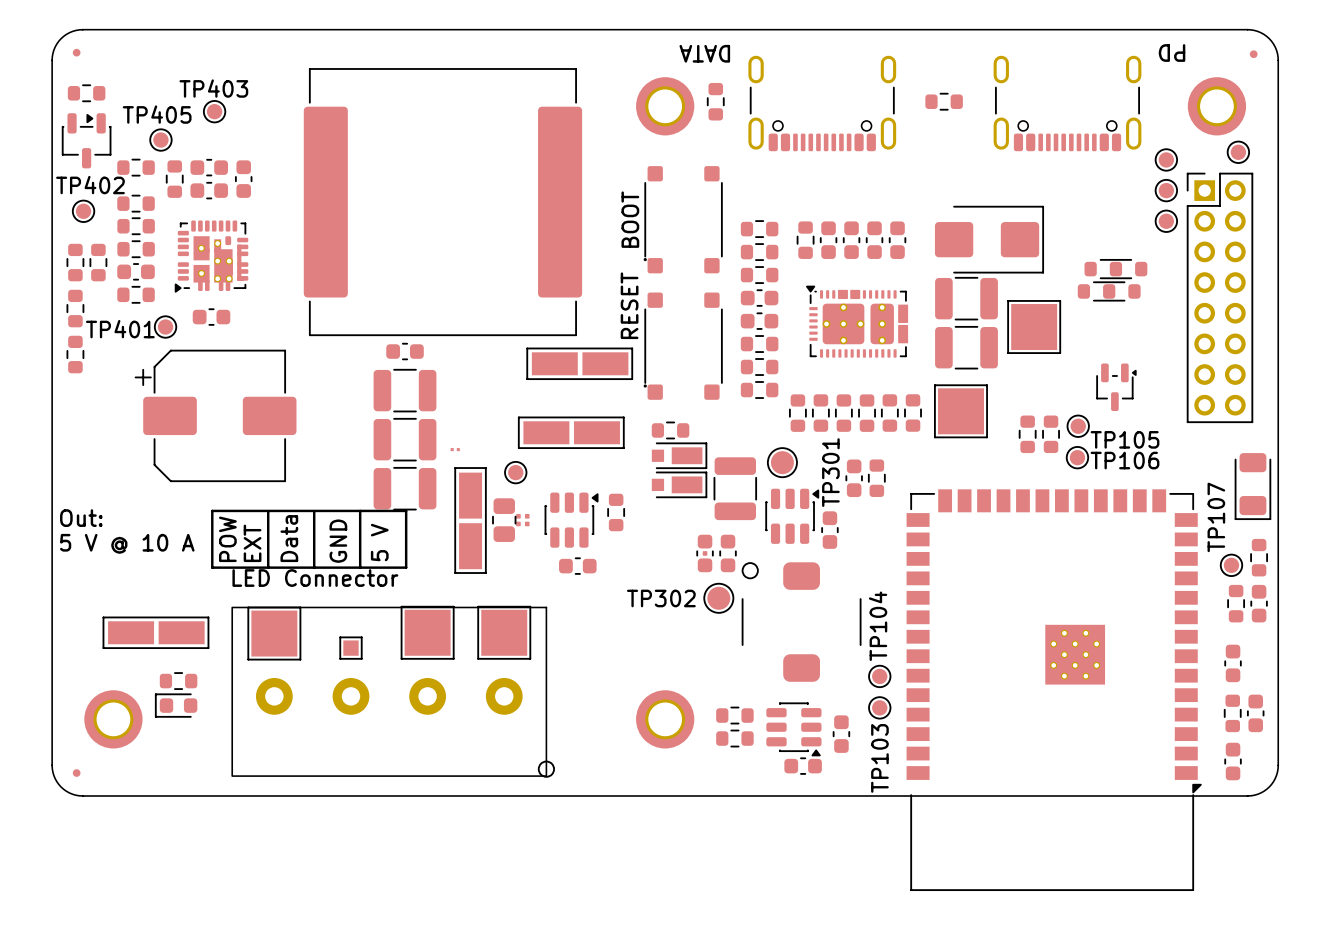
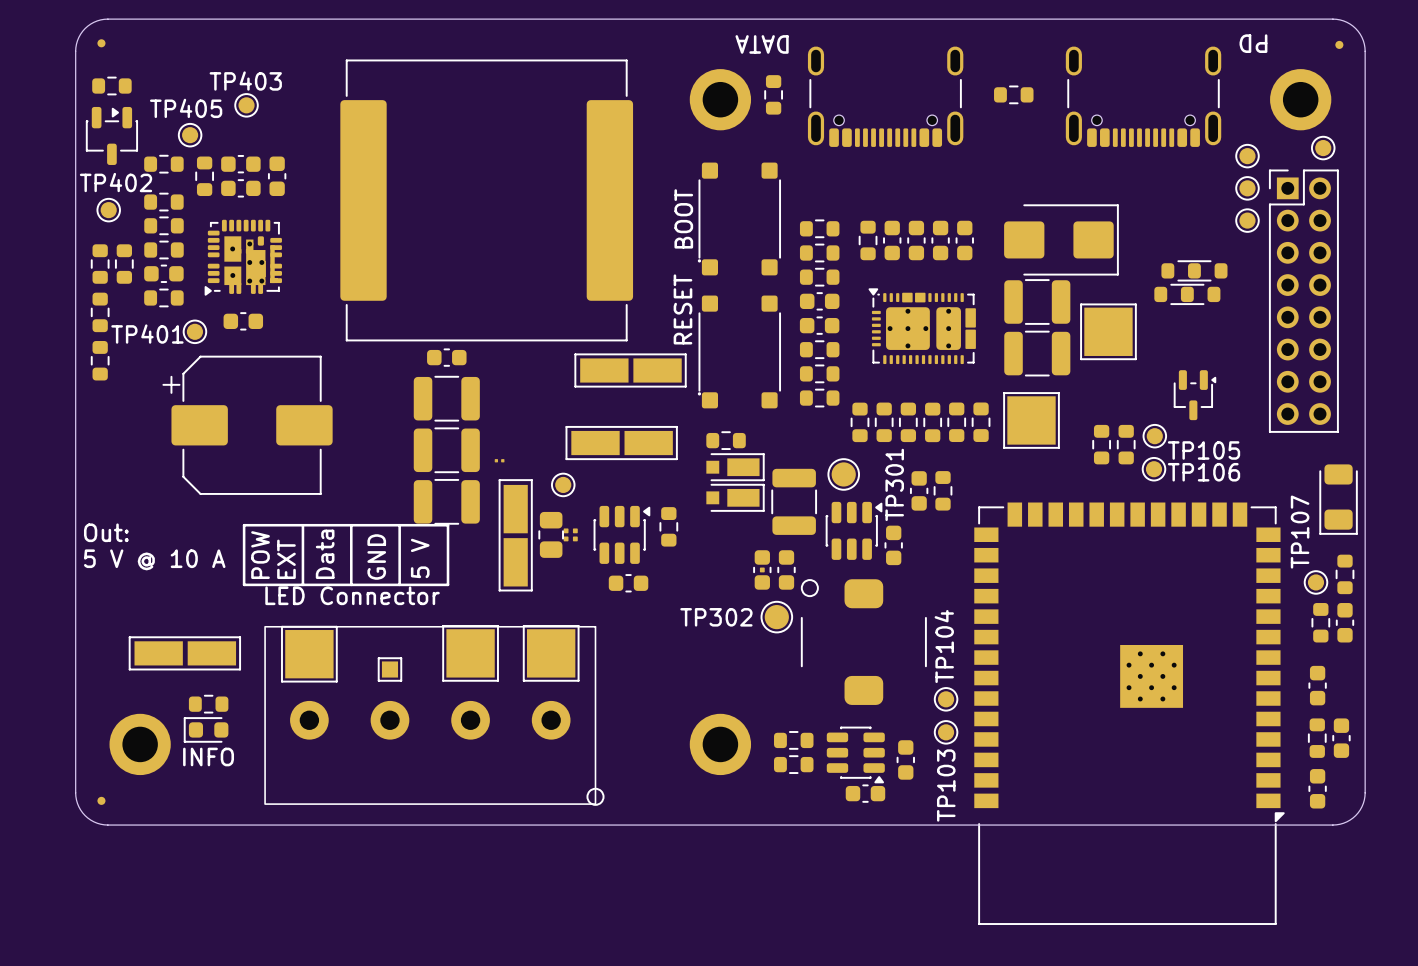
text: none -> INFO (208, 756)

